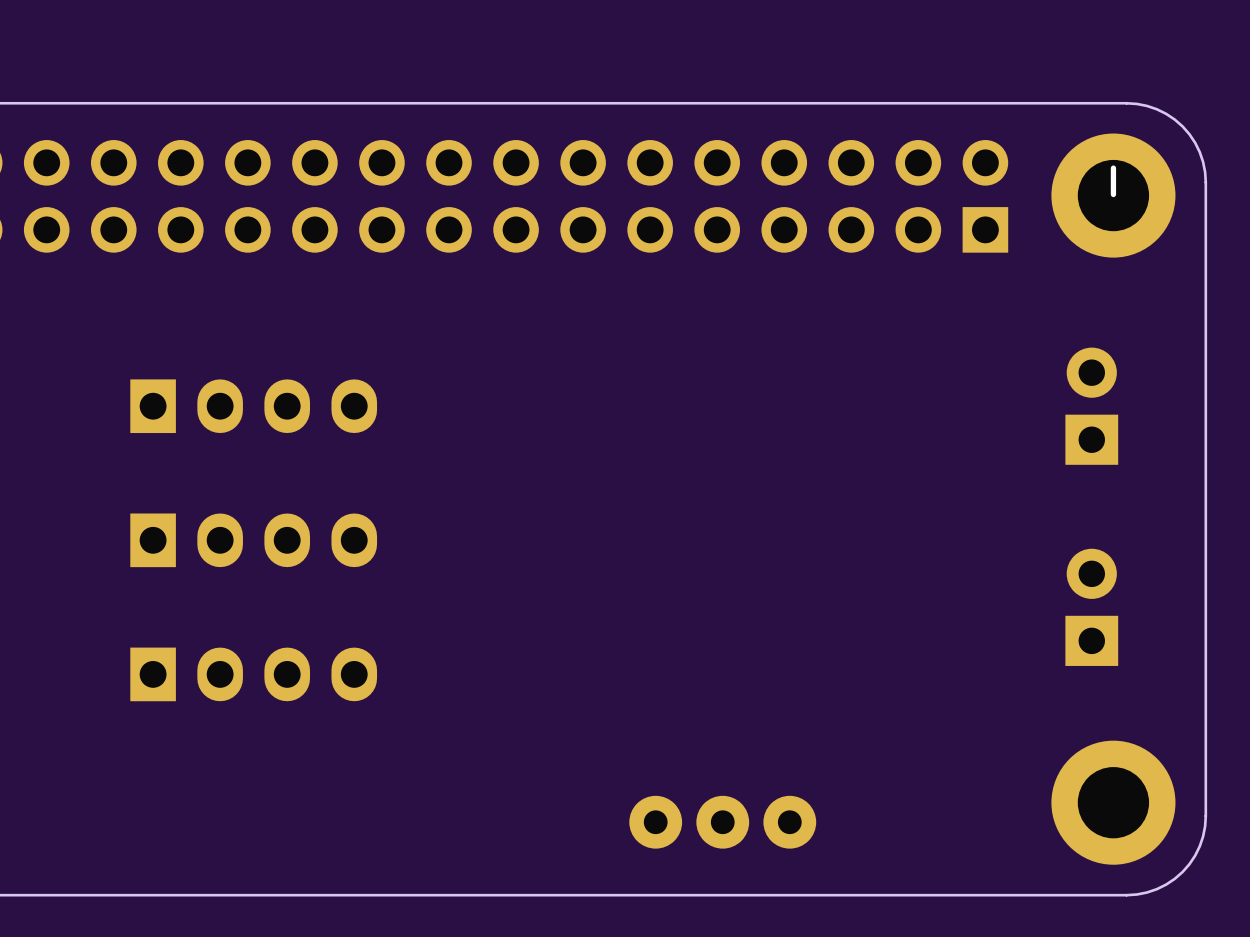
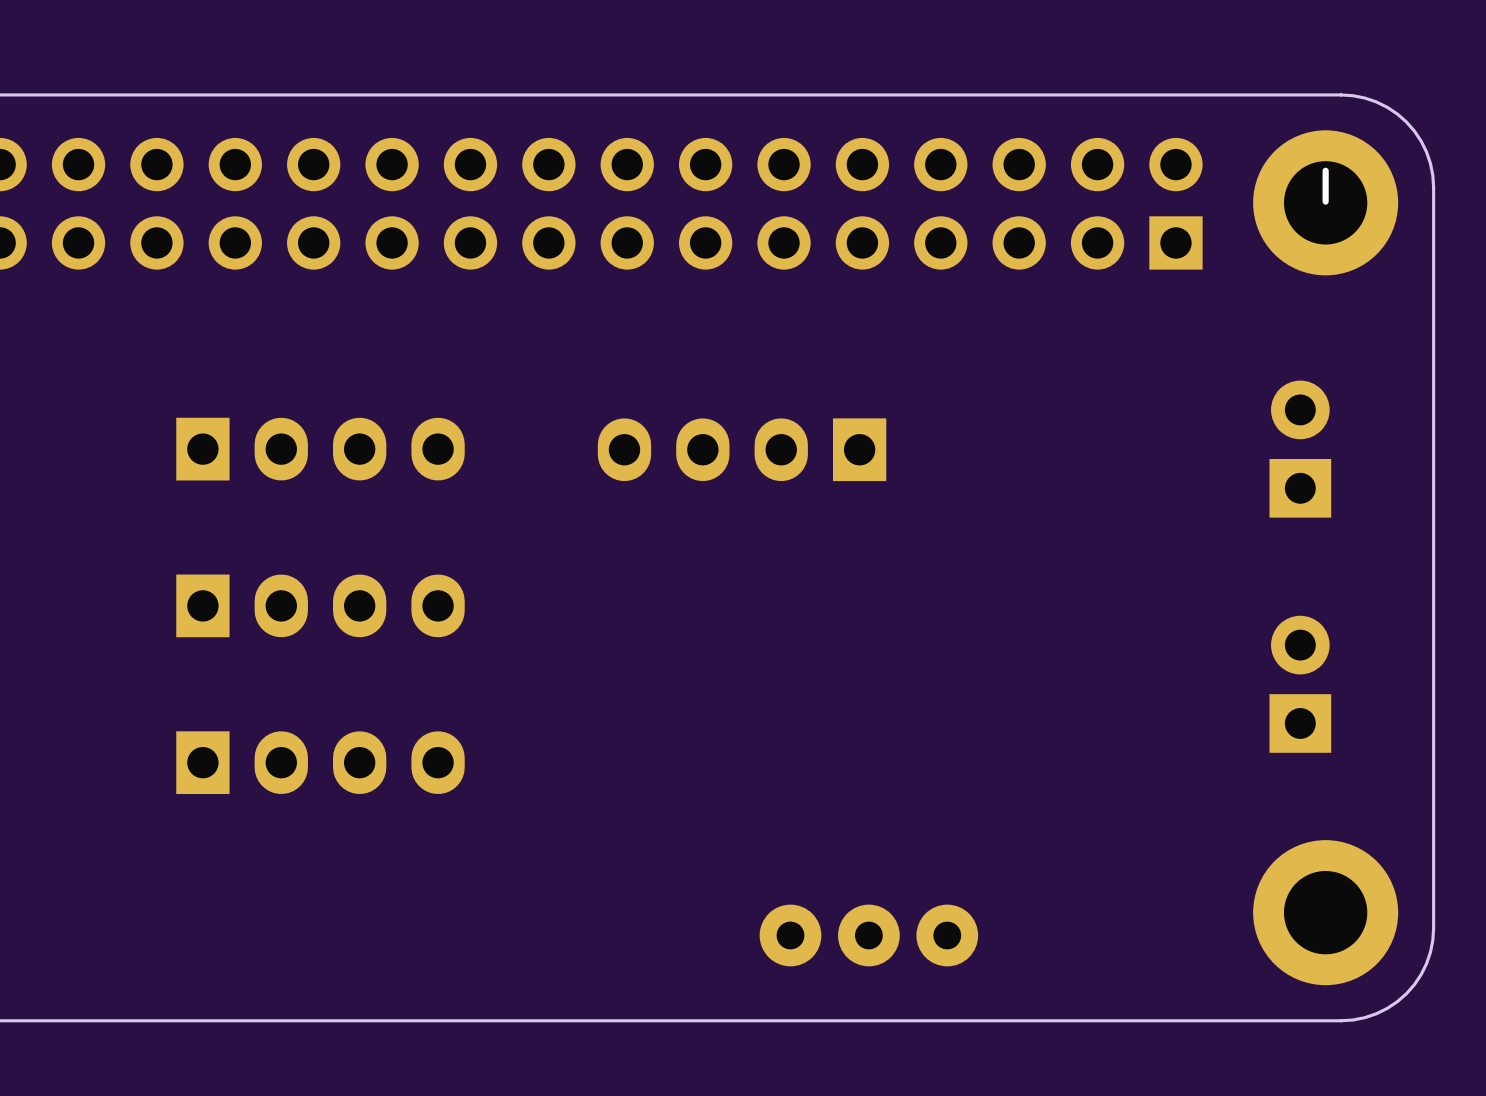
part: none -> (742, 449)

